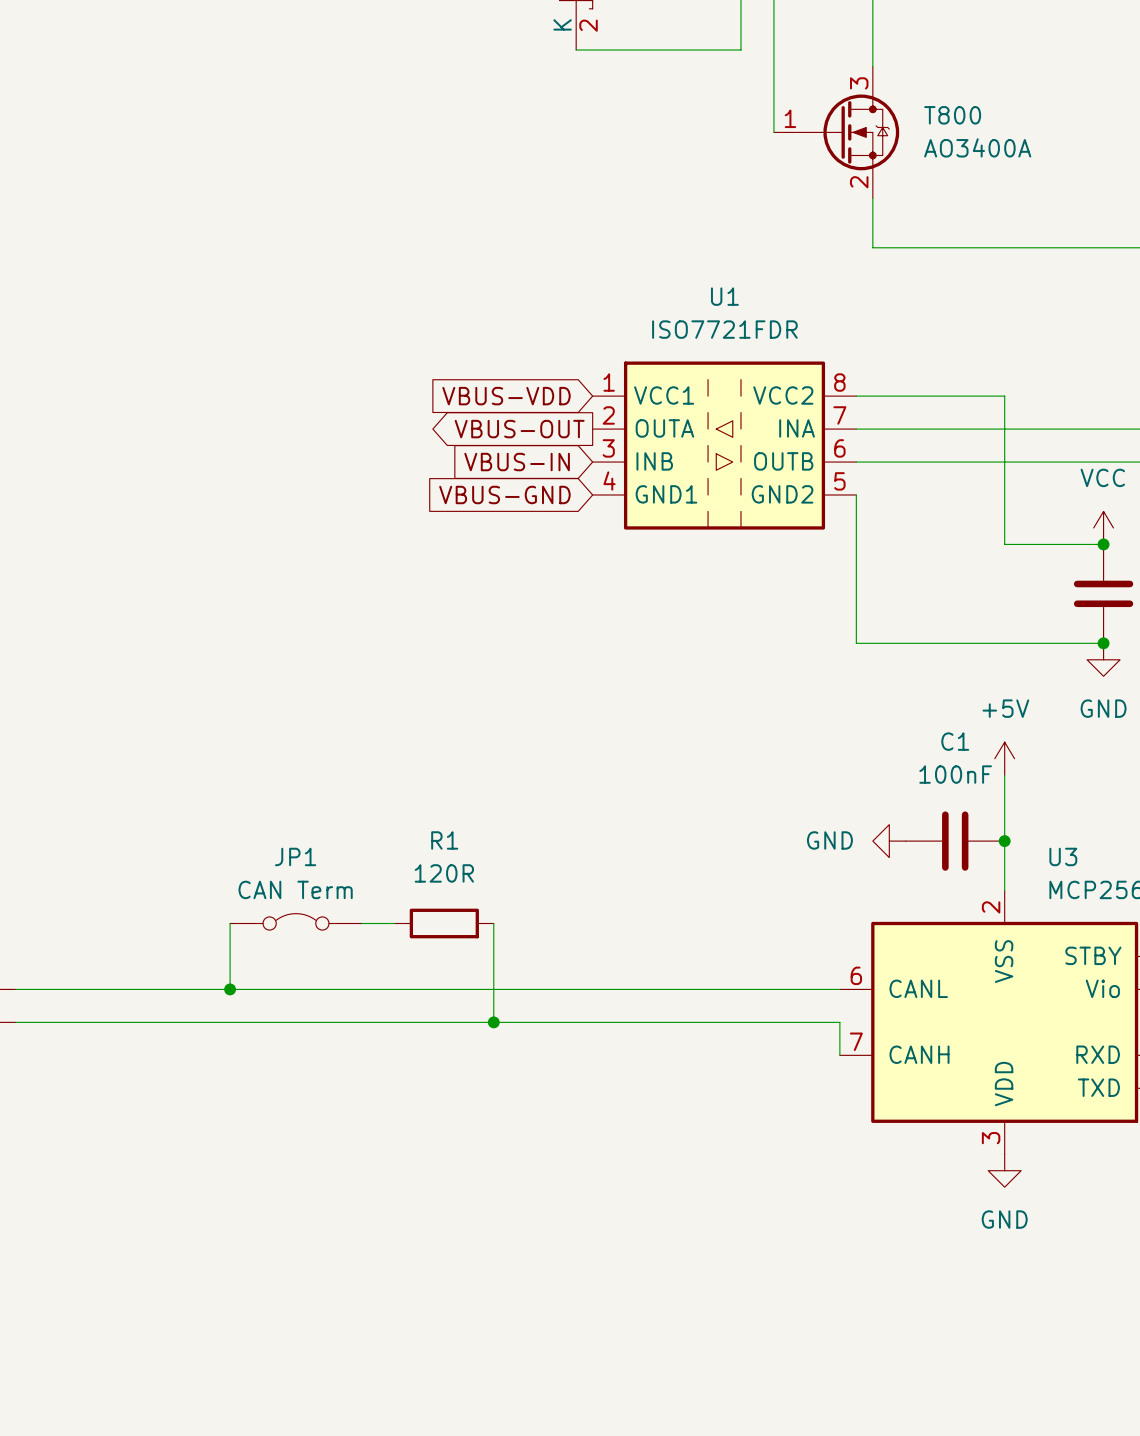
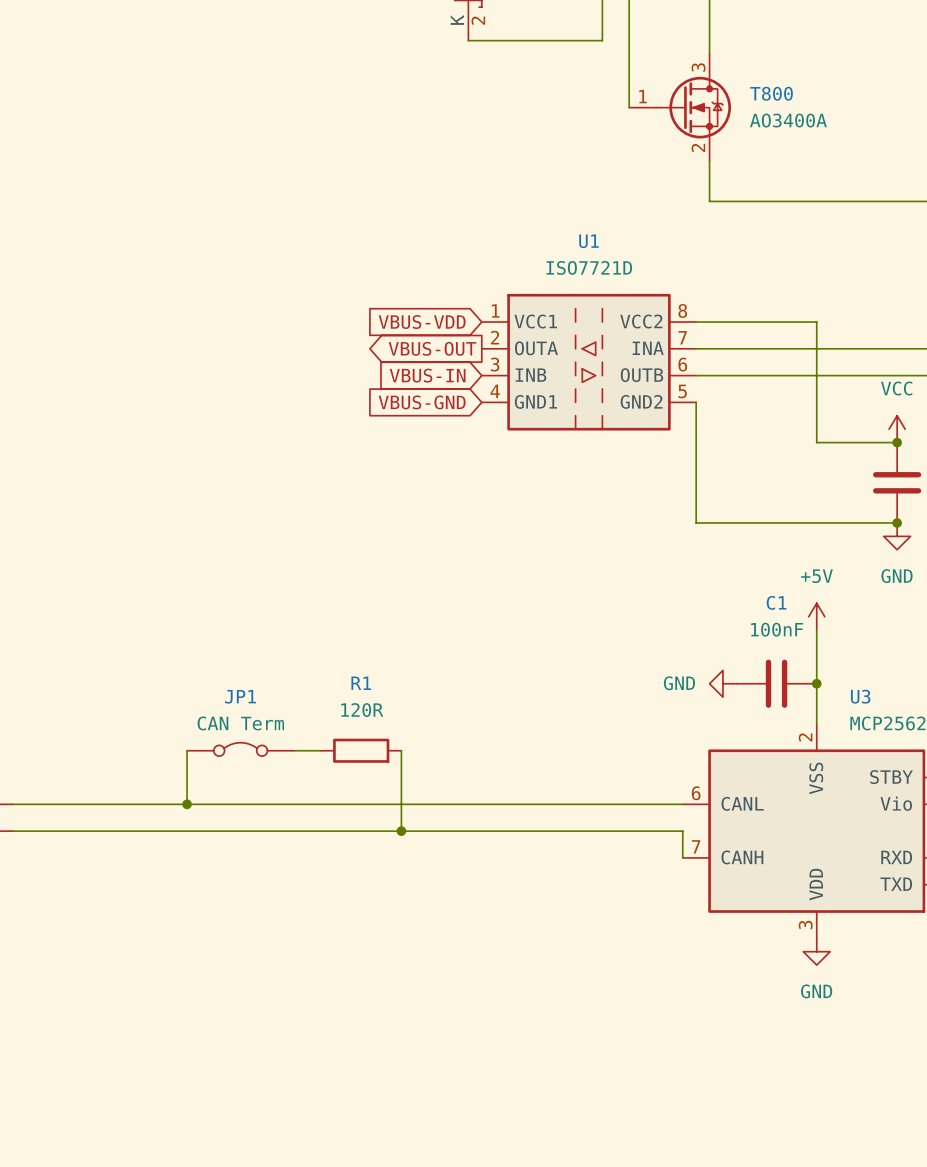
U1 value: ISO7721FDR (724, 329) -> ISO7721D (589, 267)

